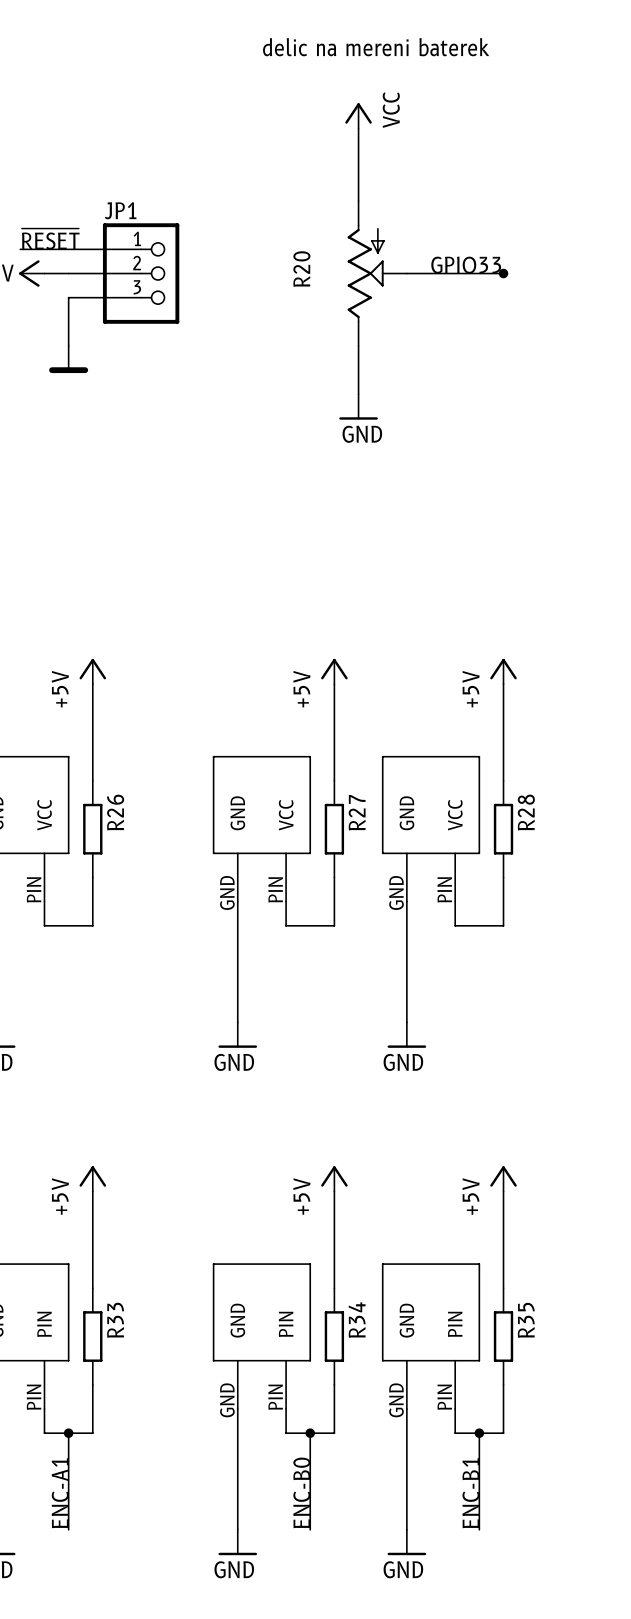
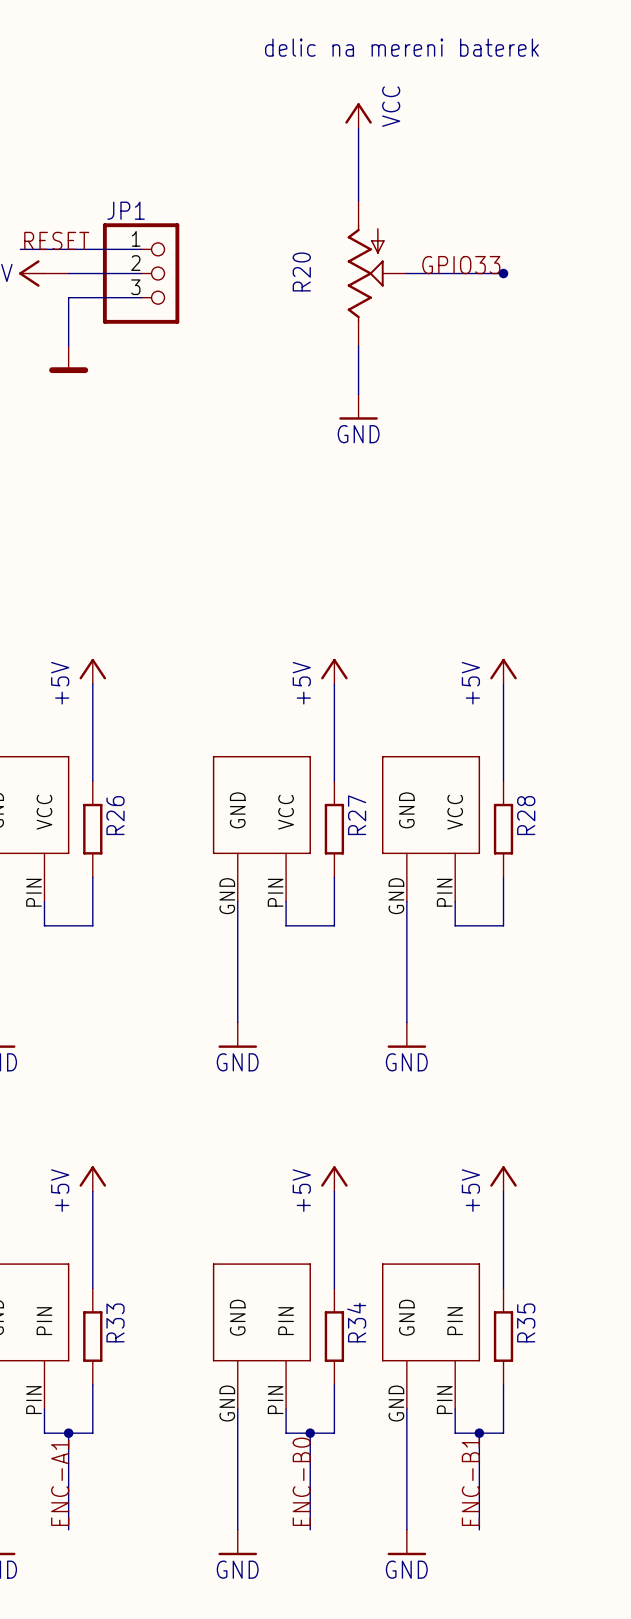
label: ~{RESET} (50, 239) -> RESET (56, 240)

